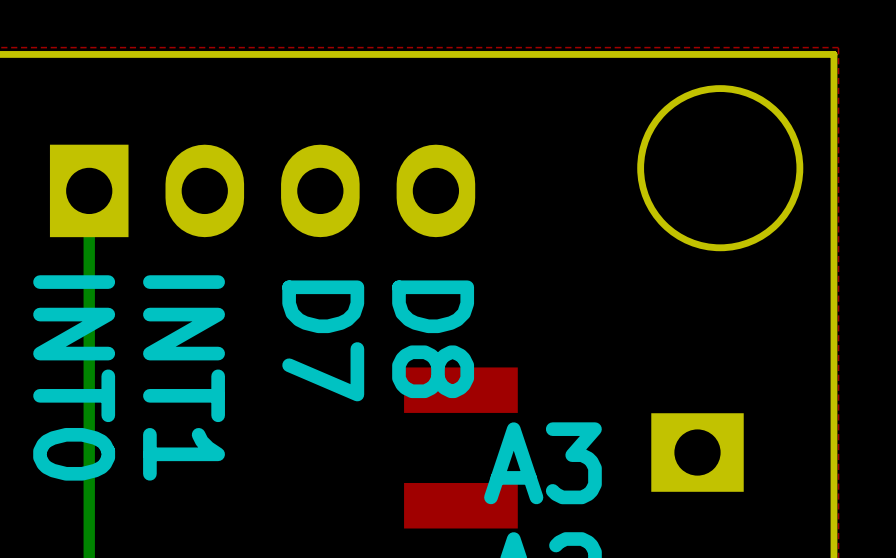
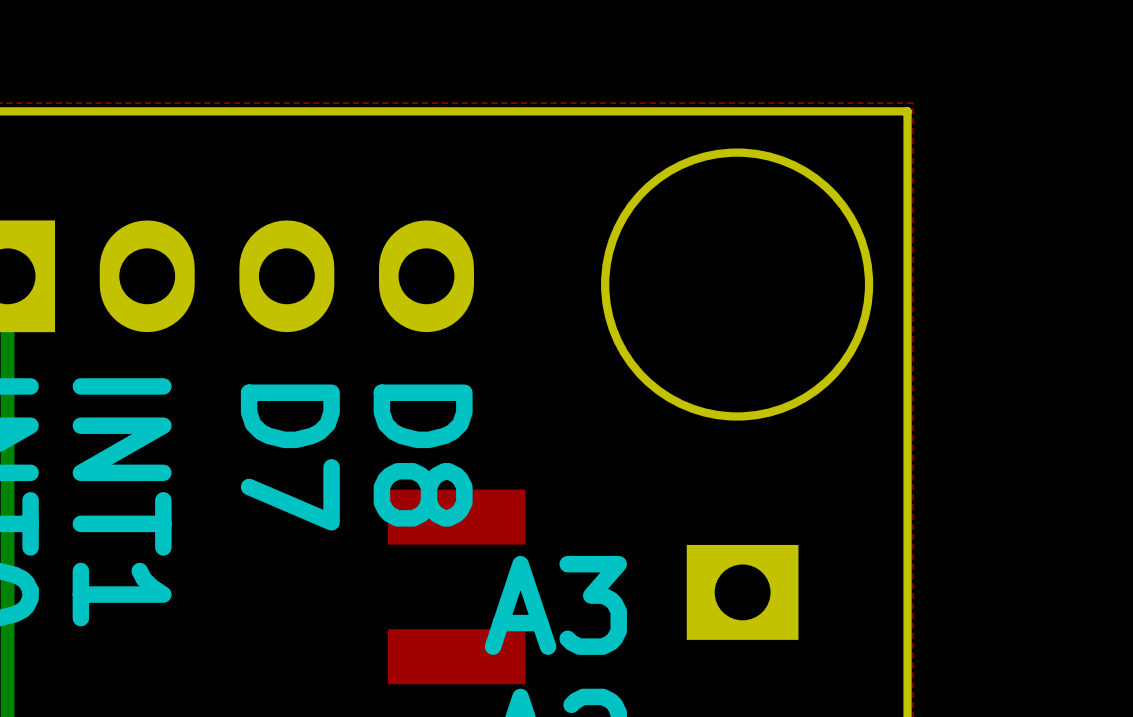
round board edge size: [637, 85, 804, 252] -> [601, 148, 874, 421]

